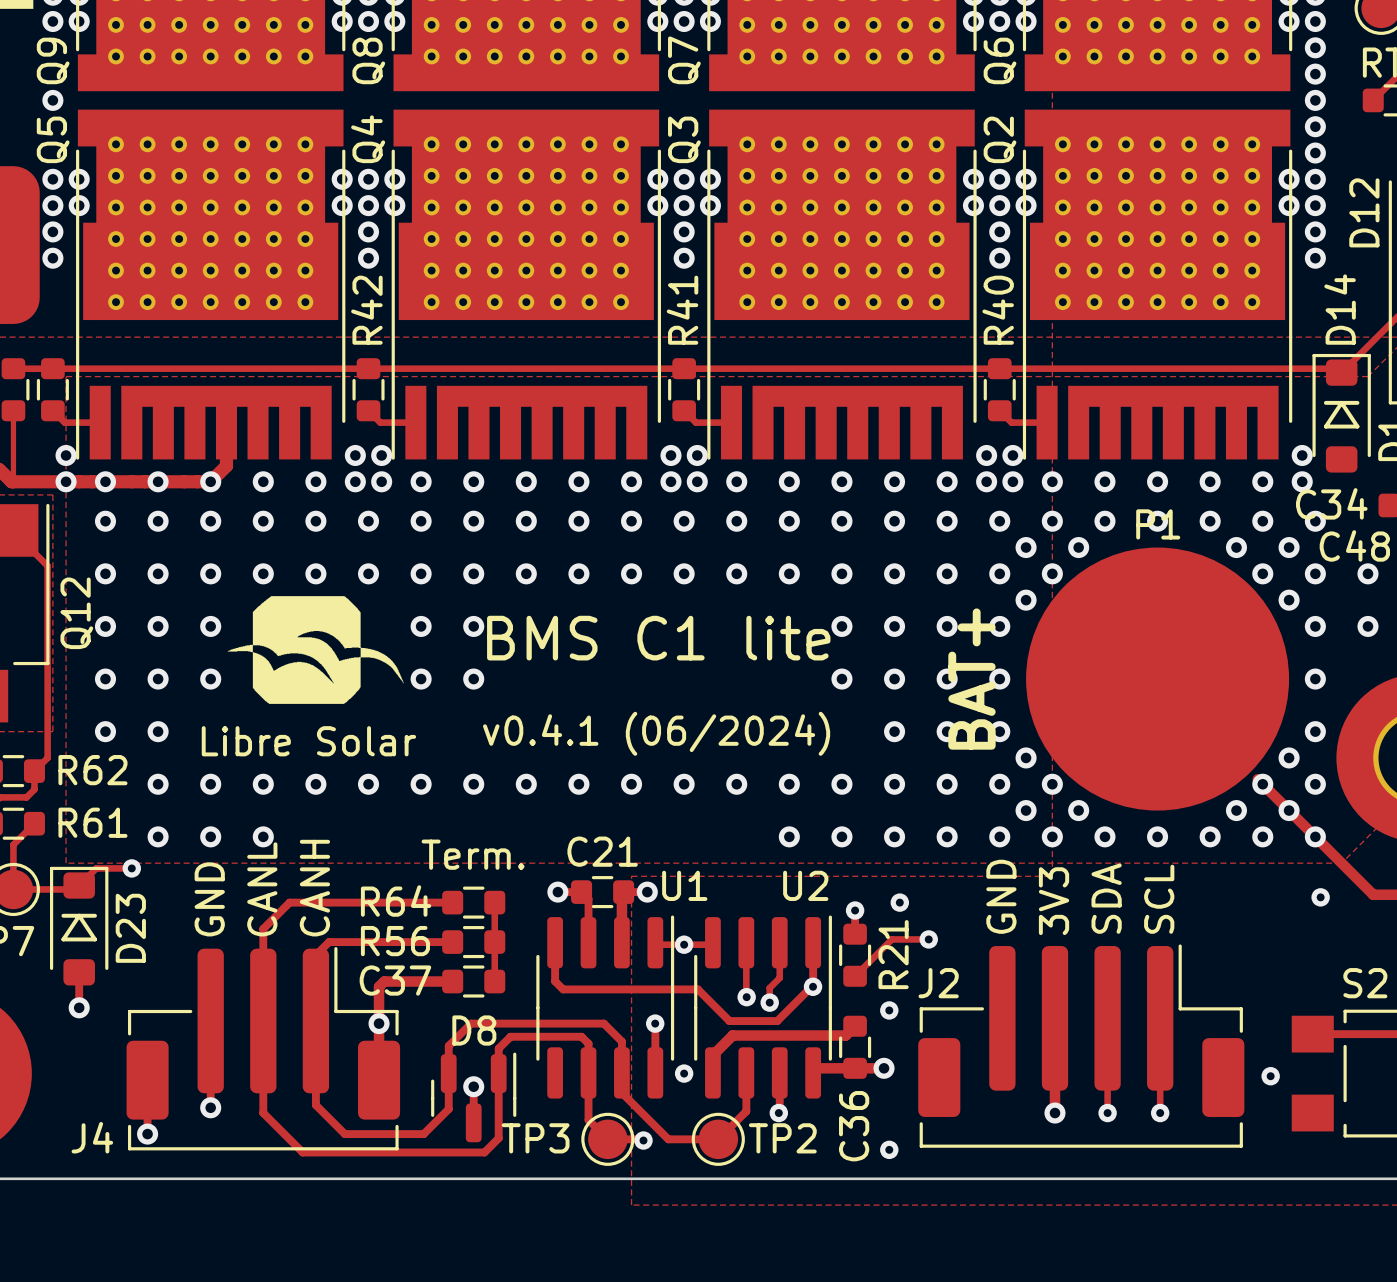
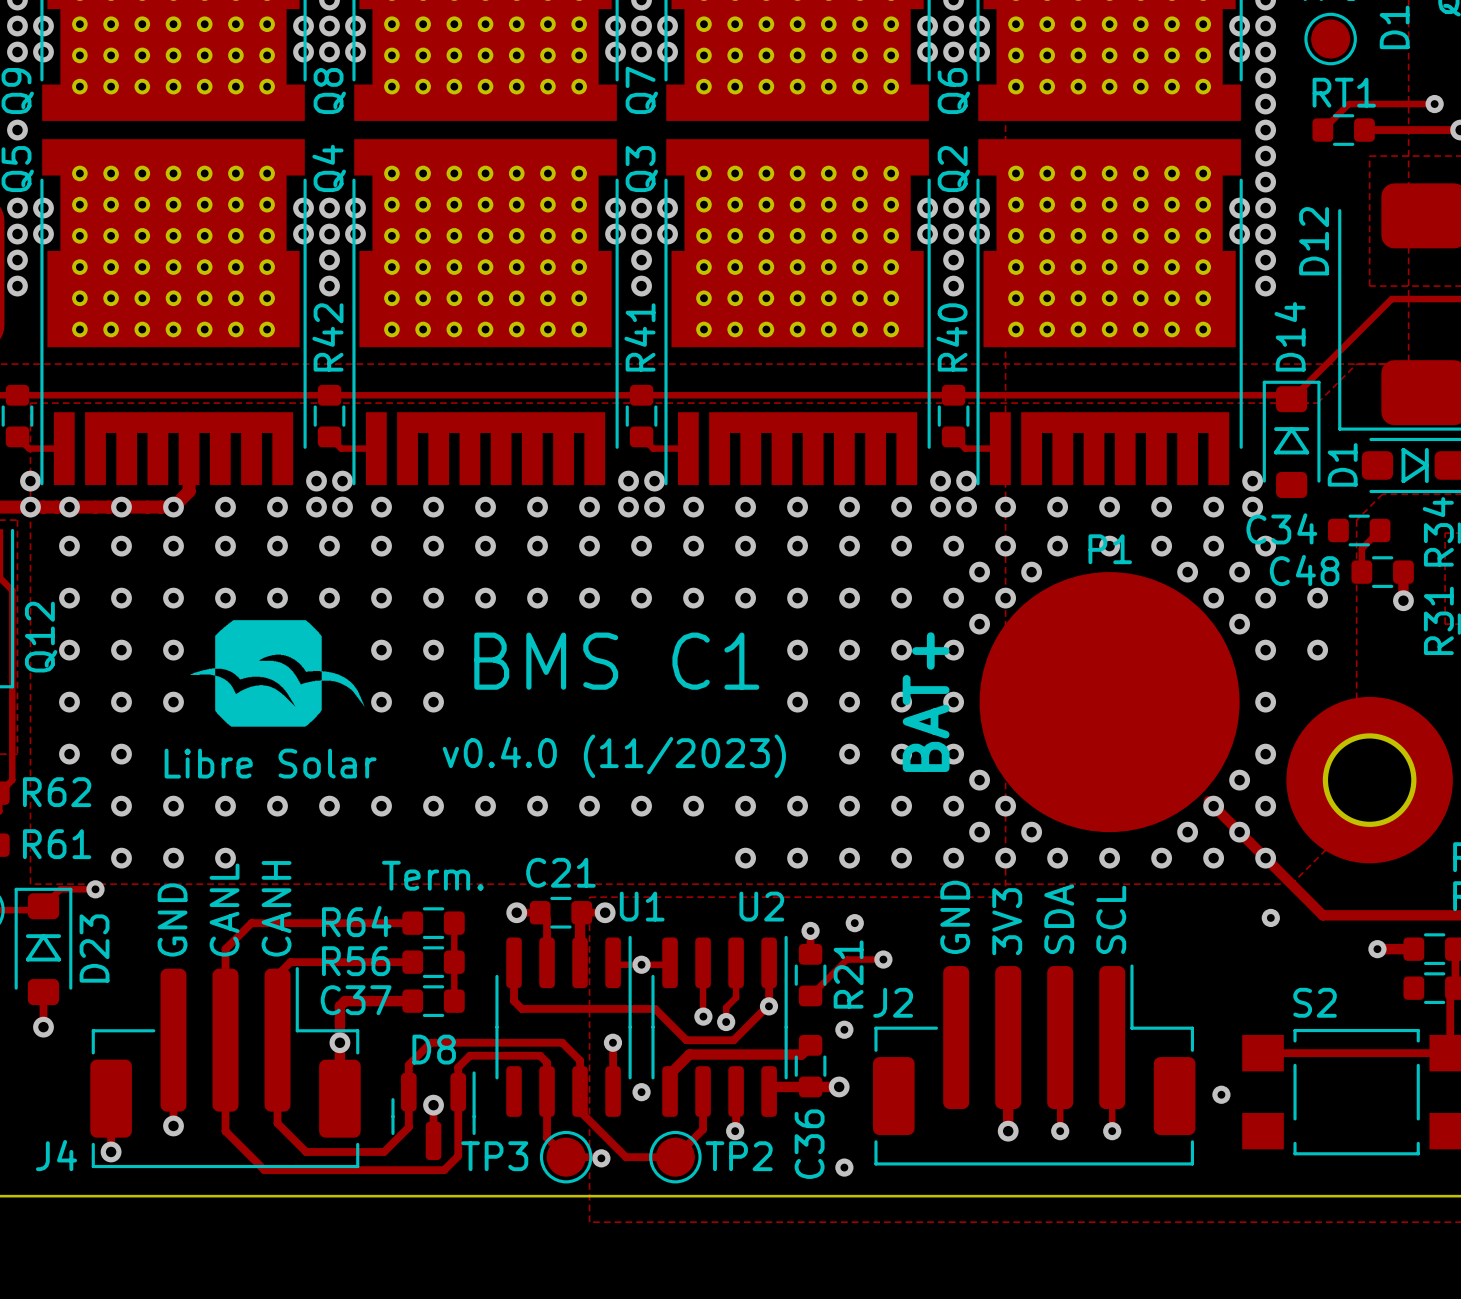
text: BMS C1 lite (658, 638) -> BMS C1 (616, 661)
text: v0.4.1 (06/2024) (656, 733) -> v0.4.0 (11/2023) (614, 756)

